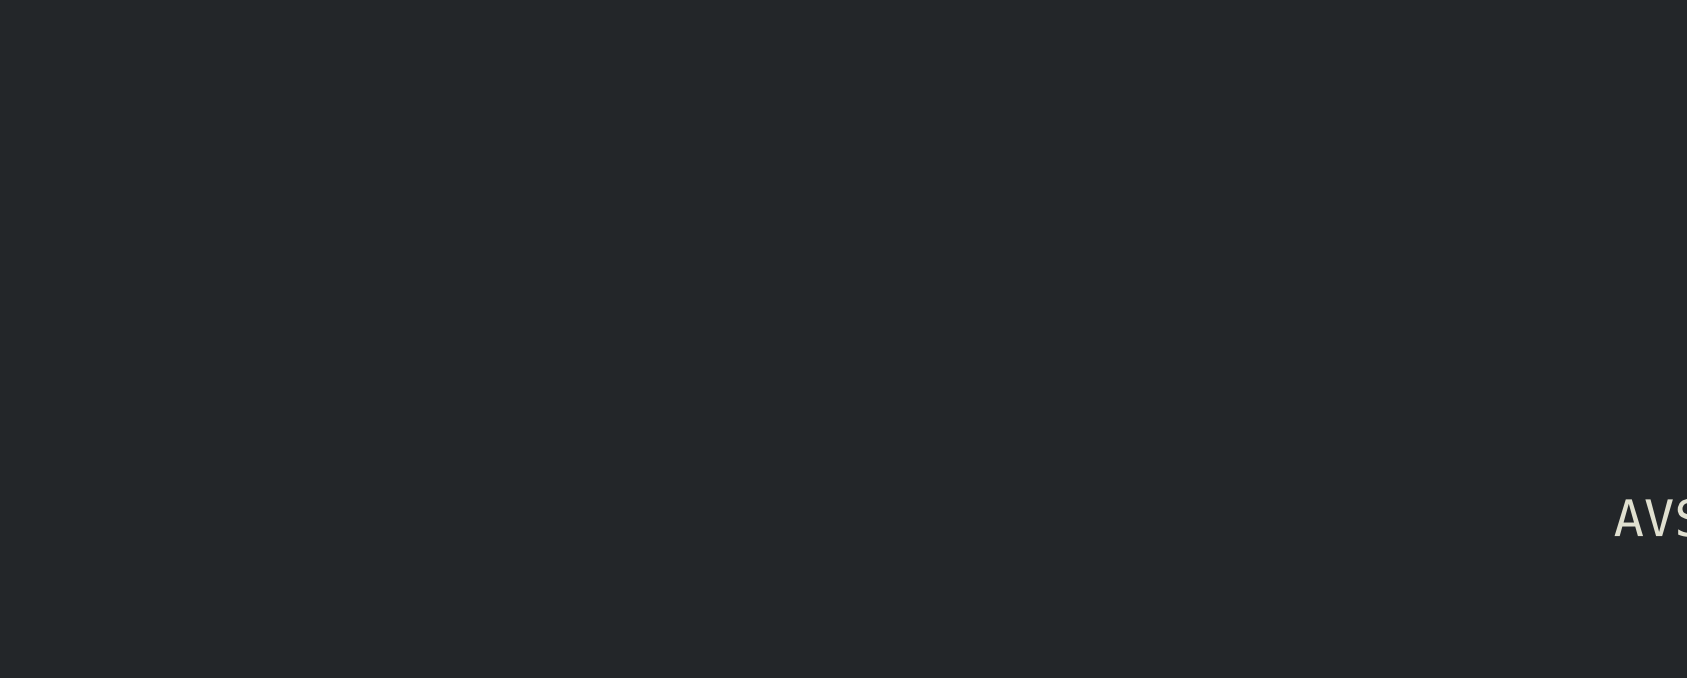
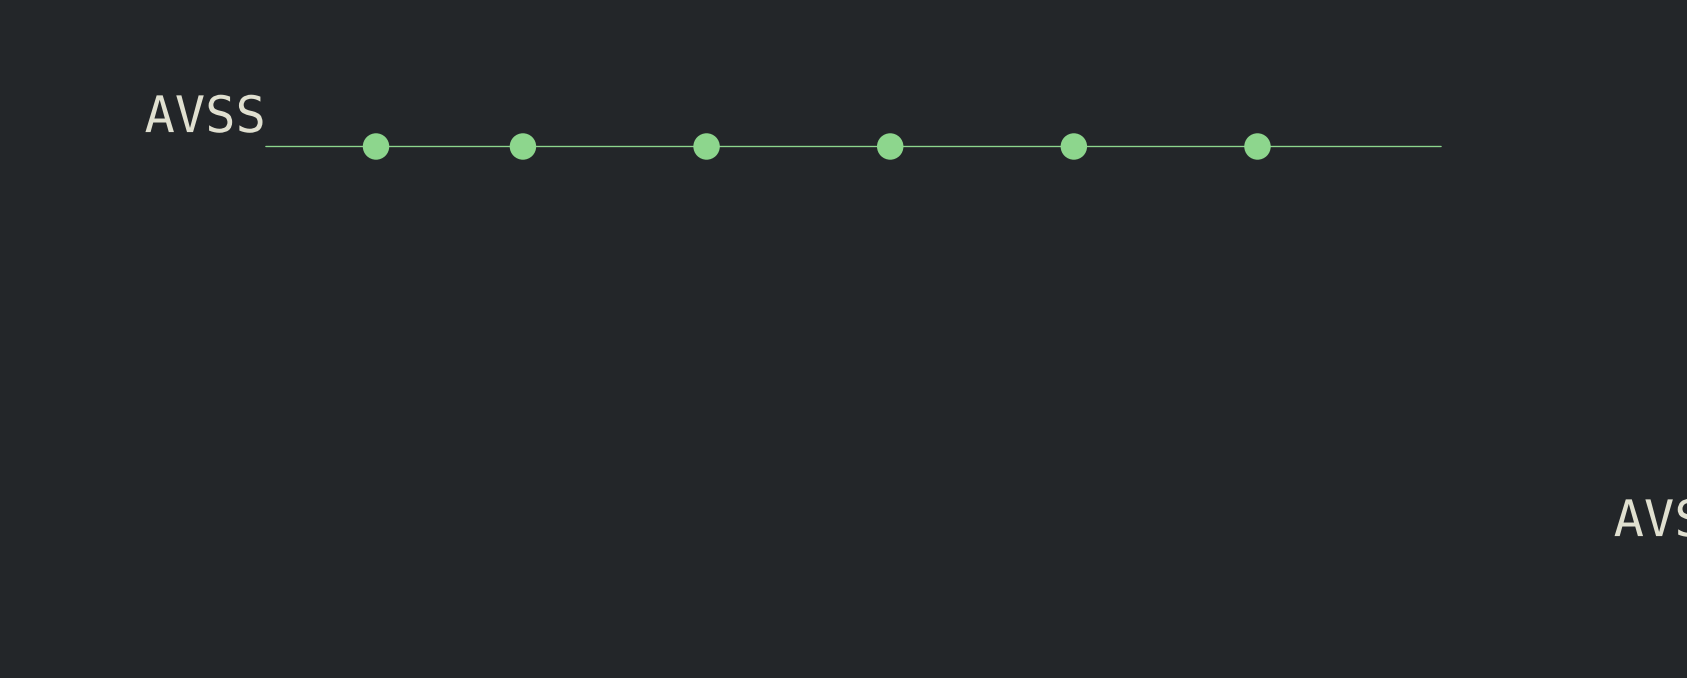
label: none -> AVSS (203, 113)
wire: none -> (265, 146) (1441, 146)
junction: none -> (376, 146)
junction: none -> (522, 146)
junction: none -> (706, 146)
junction: none -> (890, 146)
junction: none -> (1073, 146)
junction: none -> (1257, 146)

